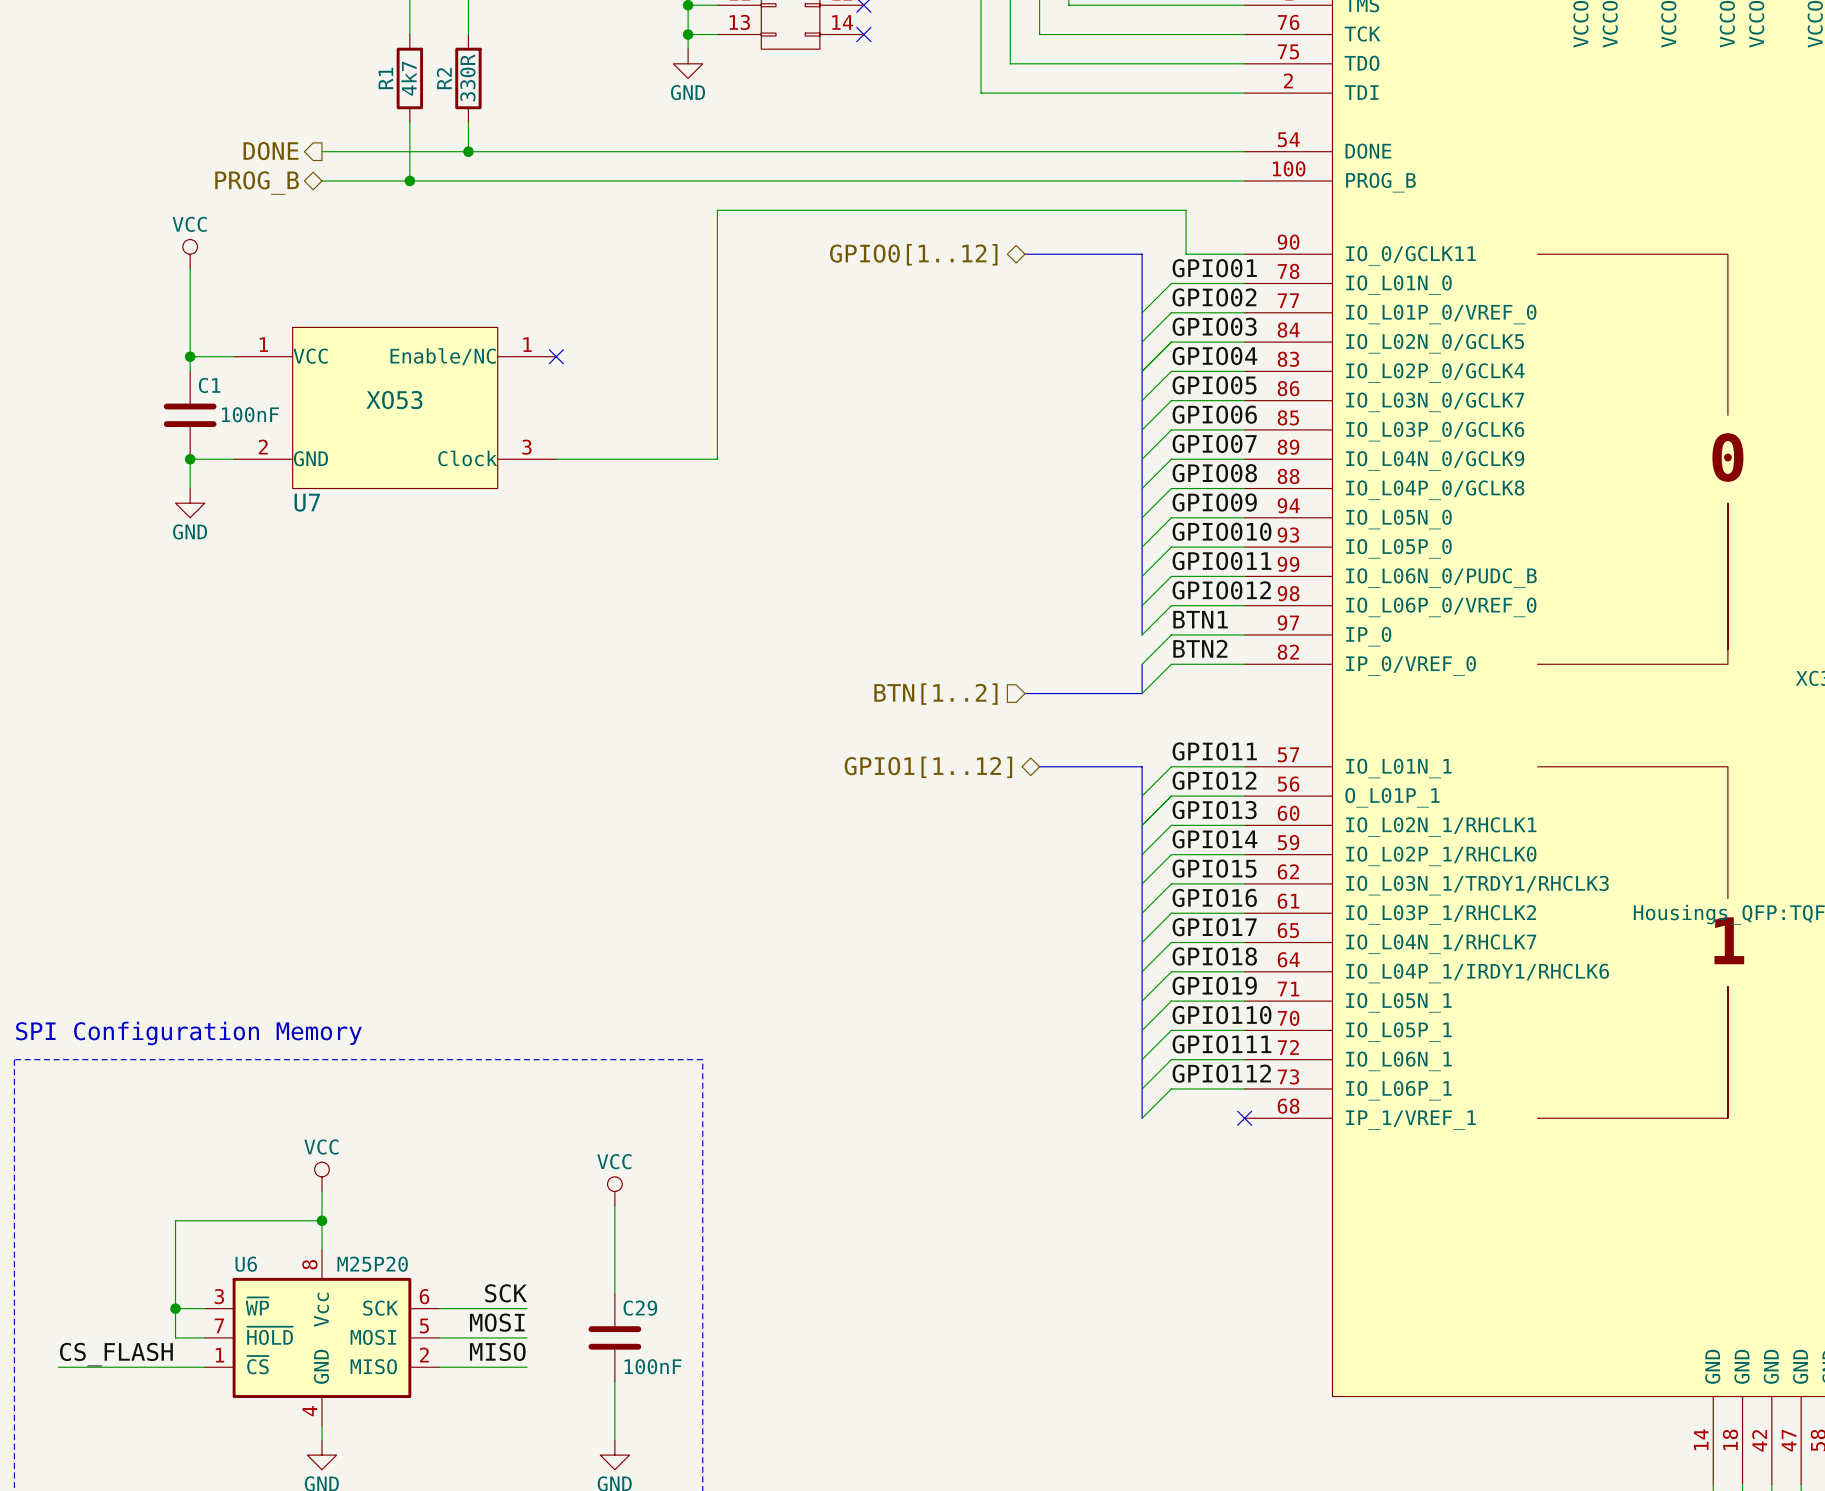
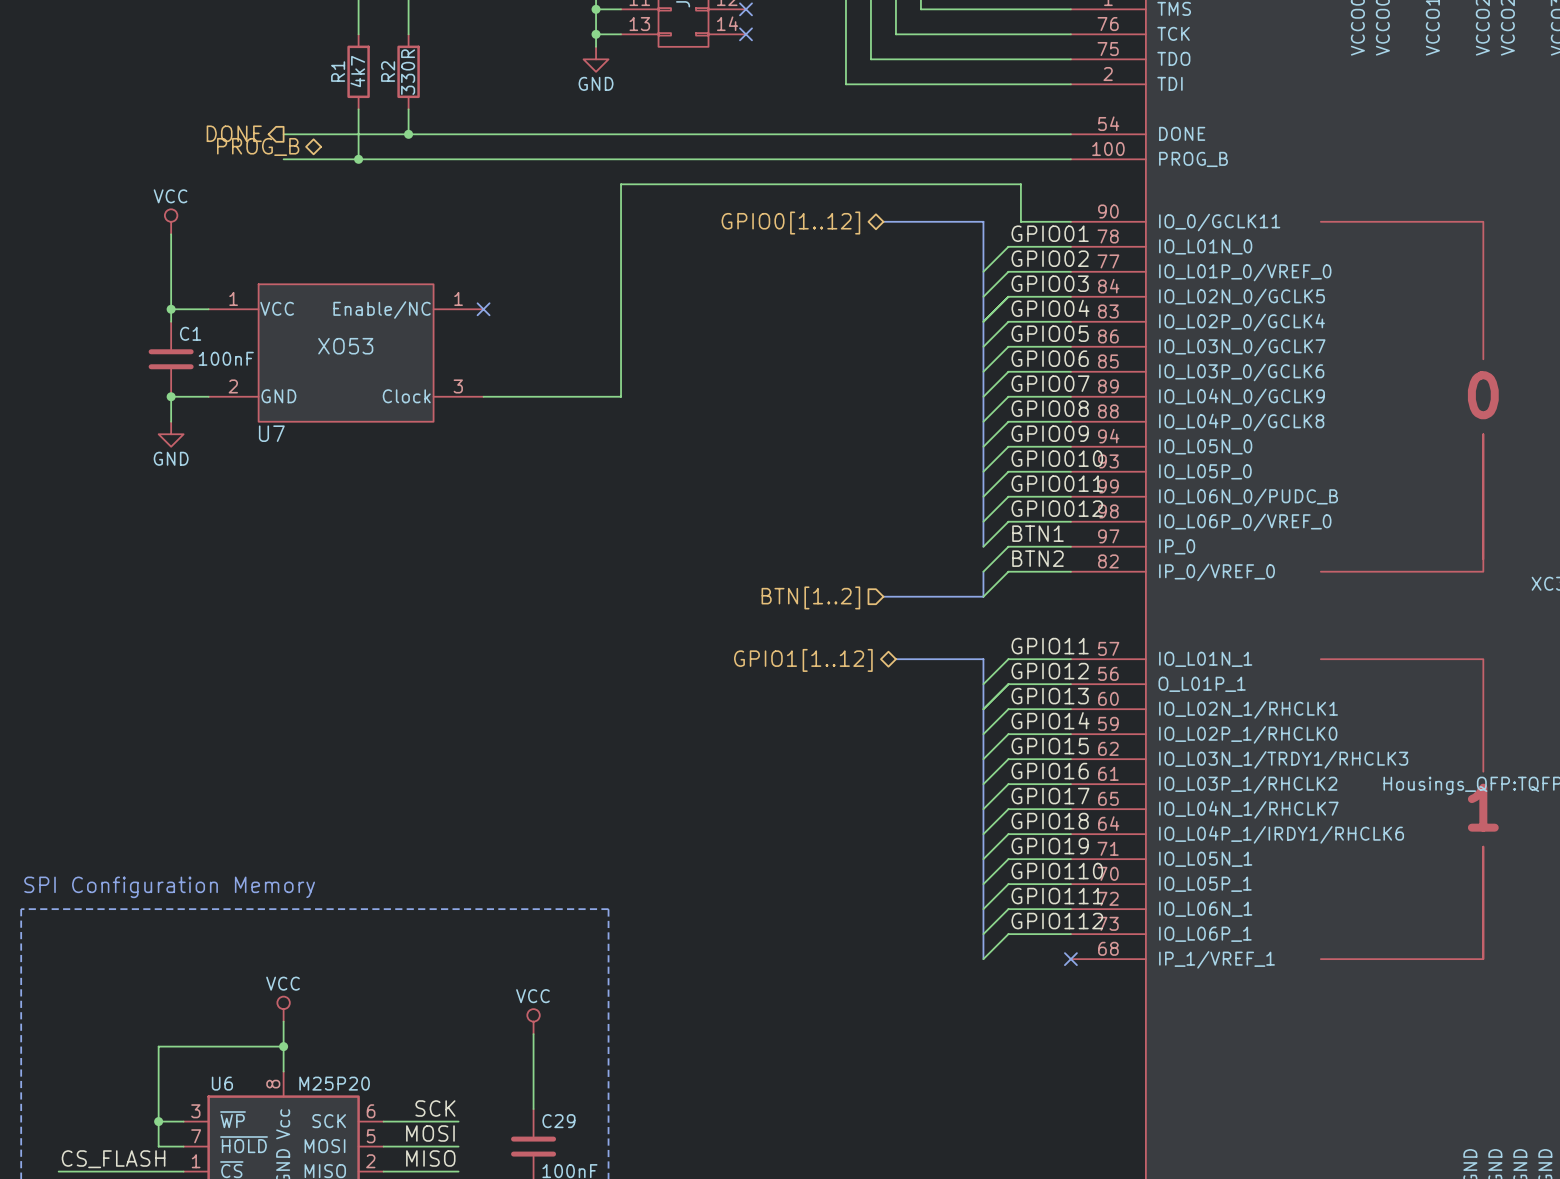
hierarchical label position: PROG_B (257, 183) -> PROG_B (258, 146)

